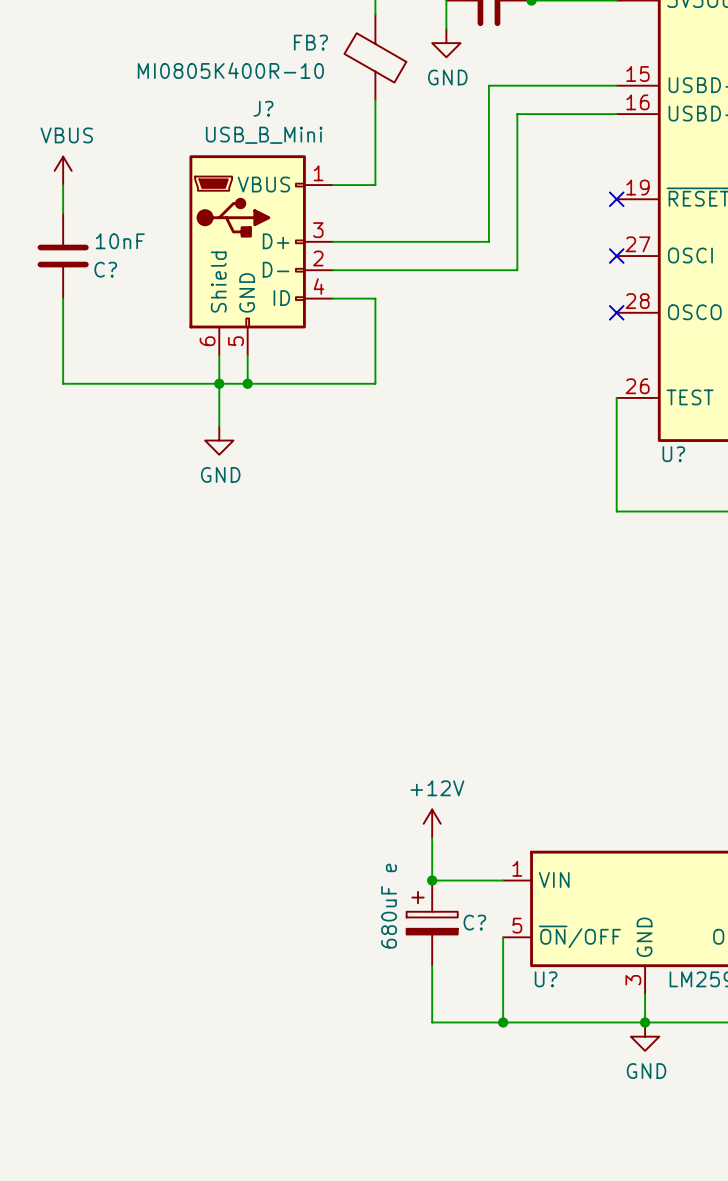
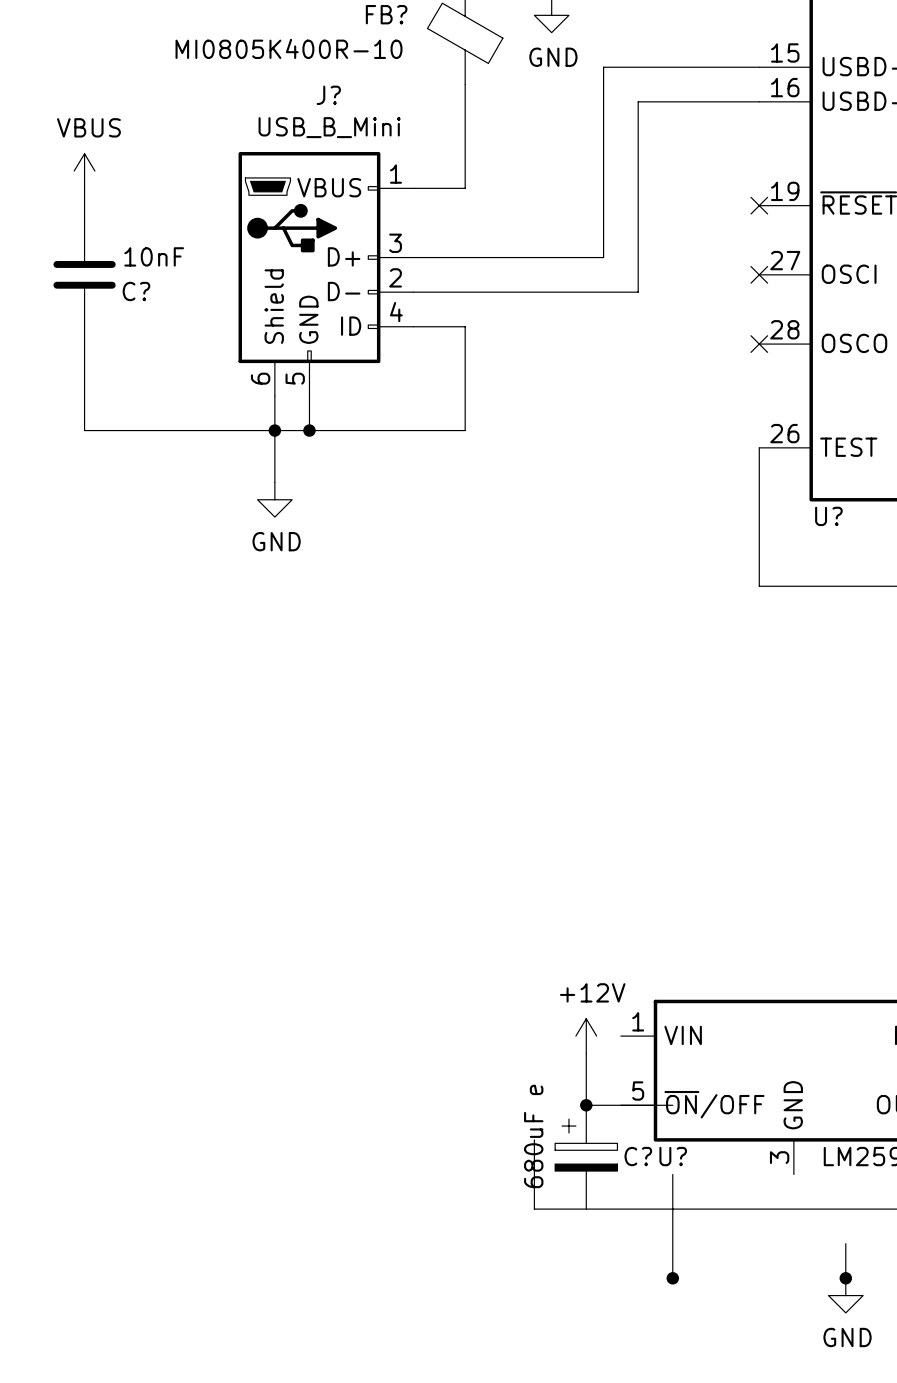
power symbol position: +12V (432, 823) -> +12V (586, 1036)
wire: (432, 837) (432, 880) (503, 880) -> (586, 1053) (586, 1105) (672, 1105)
junction: (432, 880) -> none
C? position: (432, 923) -> (586, 1157)
junction: none -> (586, 1105)
wire: (503, 937) (503, 1022) -> (672, 1174) (672, 1278)
wire: (645, 994) (645, 1022) -> (845, 1243) (845, 1278)
junction: (503, 1022) -> none
junction: (645, 1022) -> none
power symbol position: GND (645, 1036) -> GND (845, 1295)
junction: none -> (672, 1278)
junction: none -> (845, 1278)

